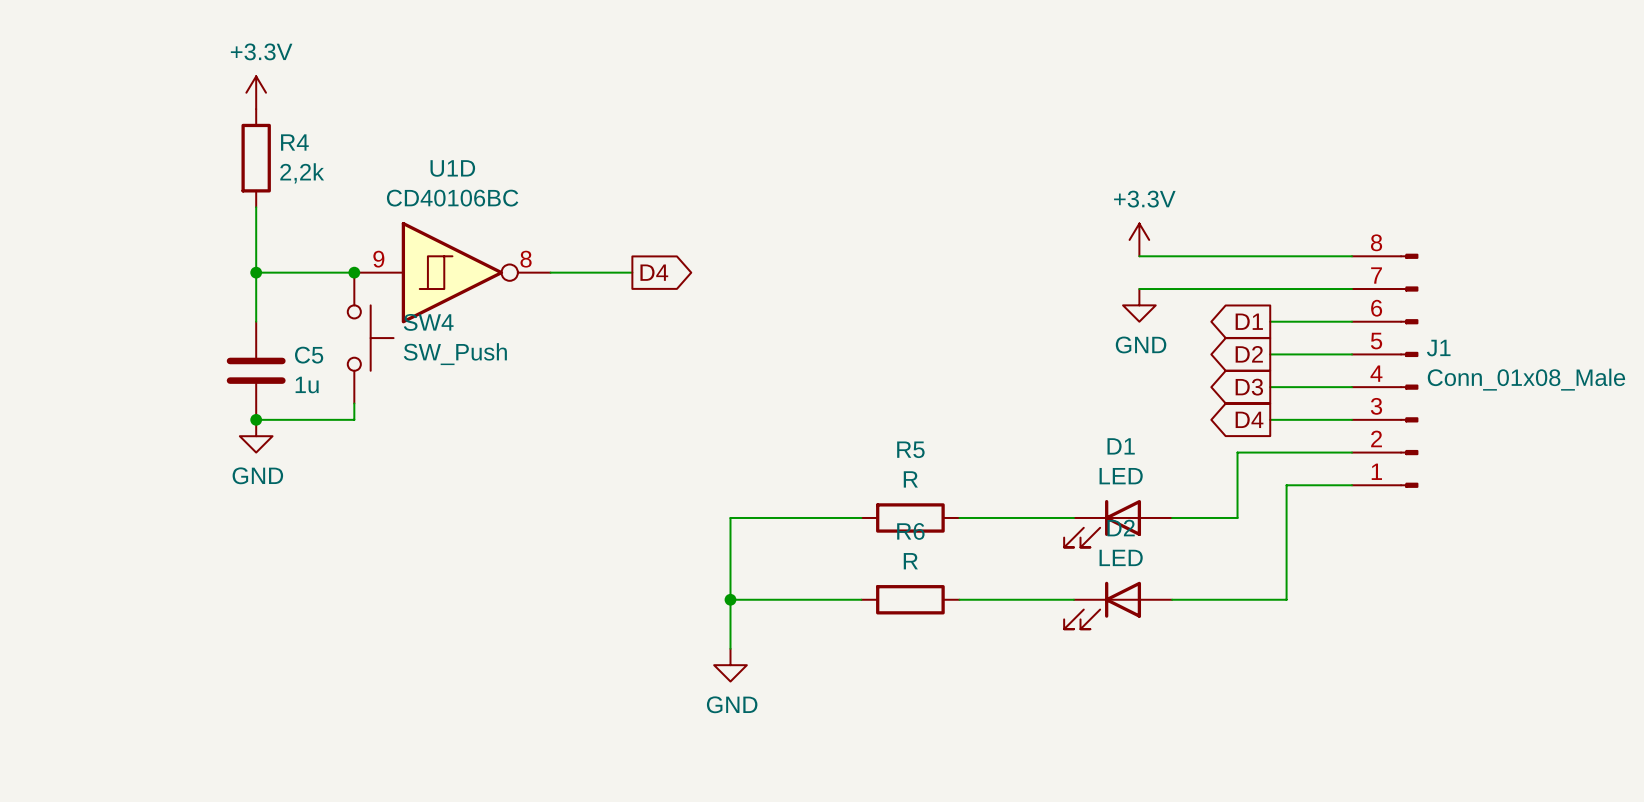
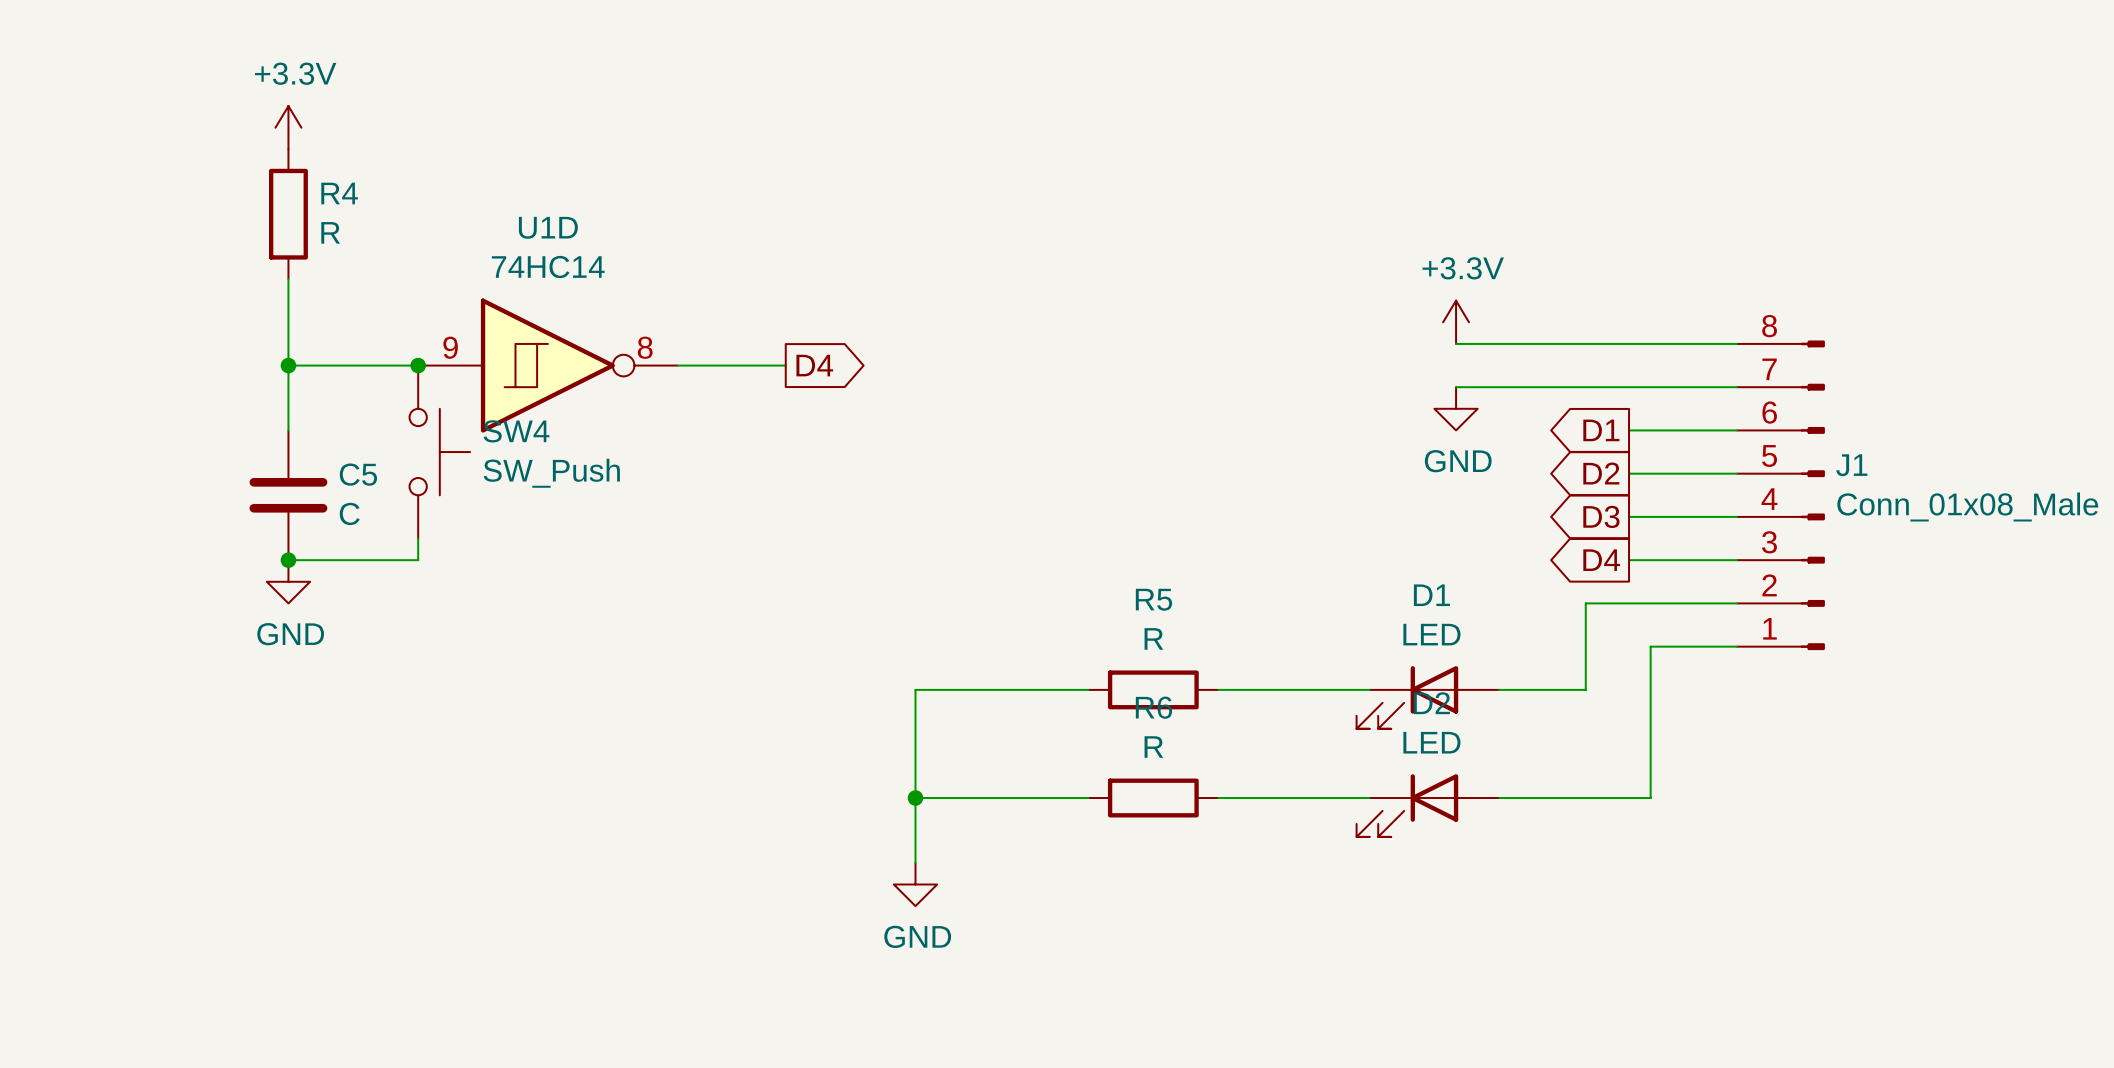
R4 value: 2,2k (302, 173) -> R (330, 232)
U1D value: CD40106BC (452, 198) -> 74HC14 (548, 267)
C5 value: 1u (307, 385) -> C (349, 513)

